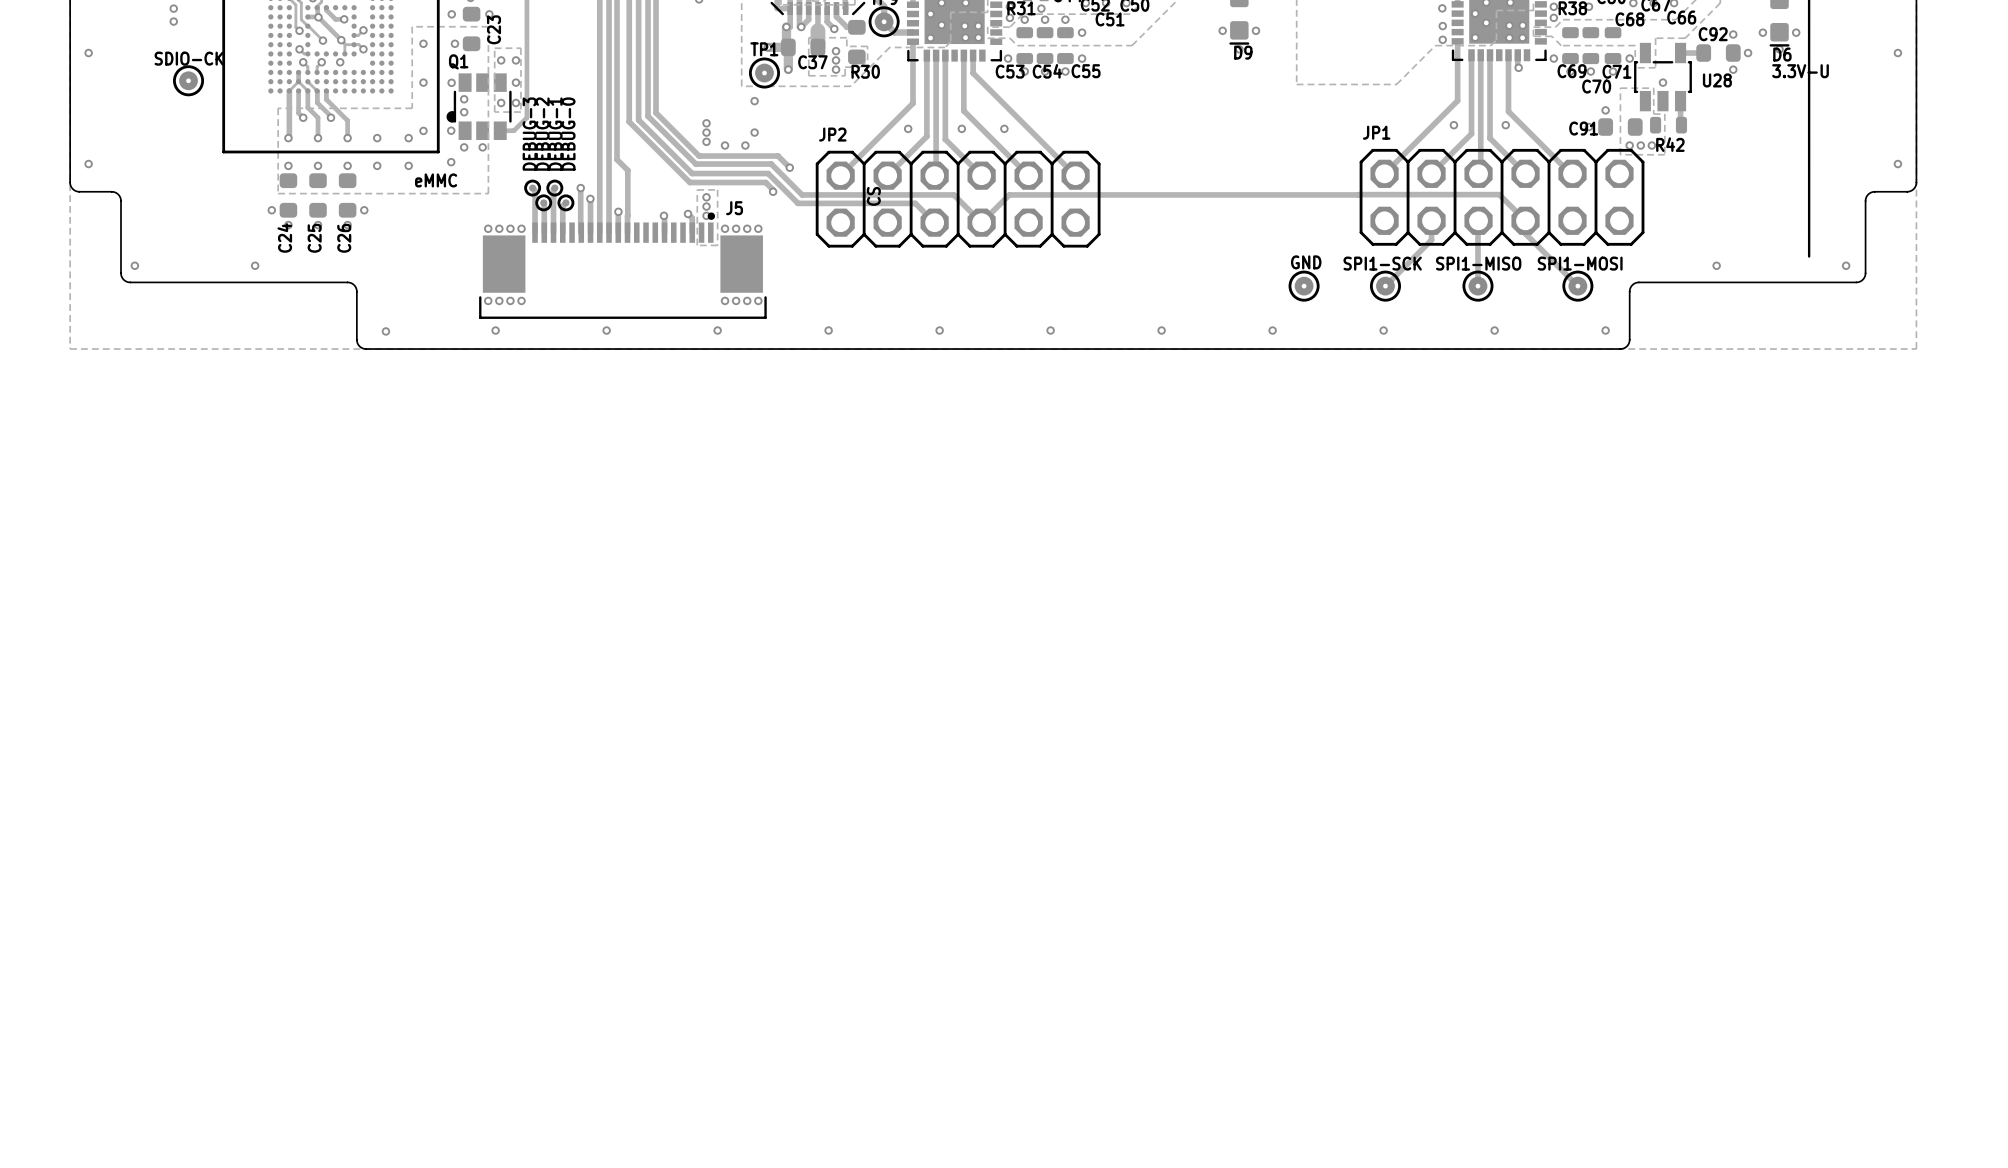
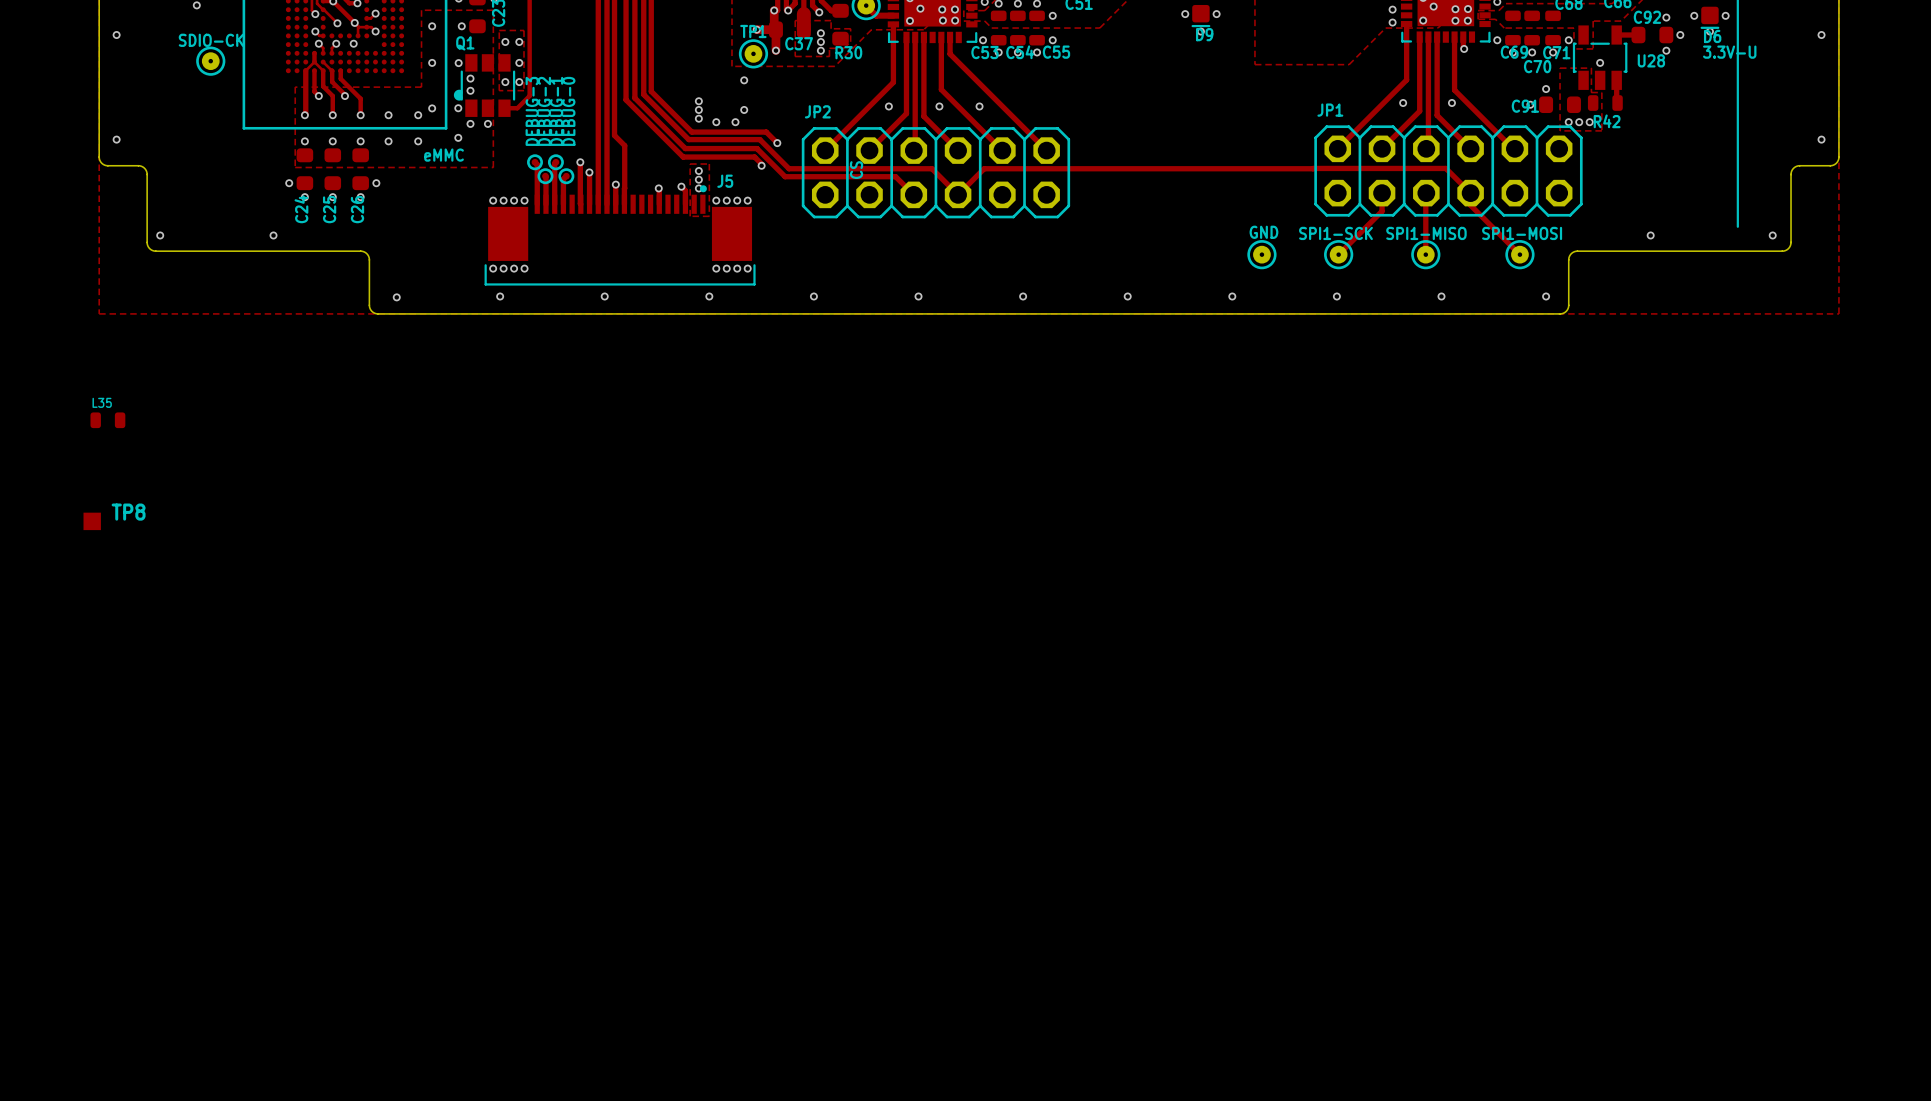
L35: none -> (107, 420)
TP8: none -> (92, 521)

